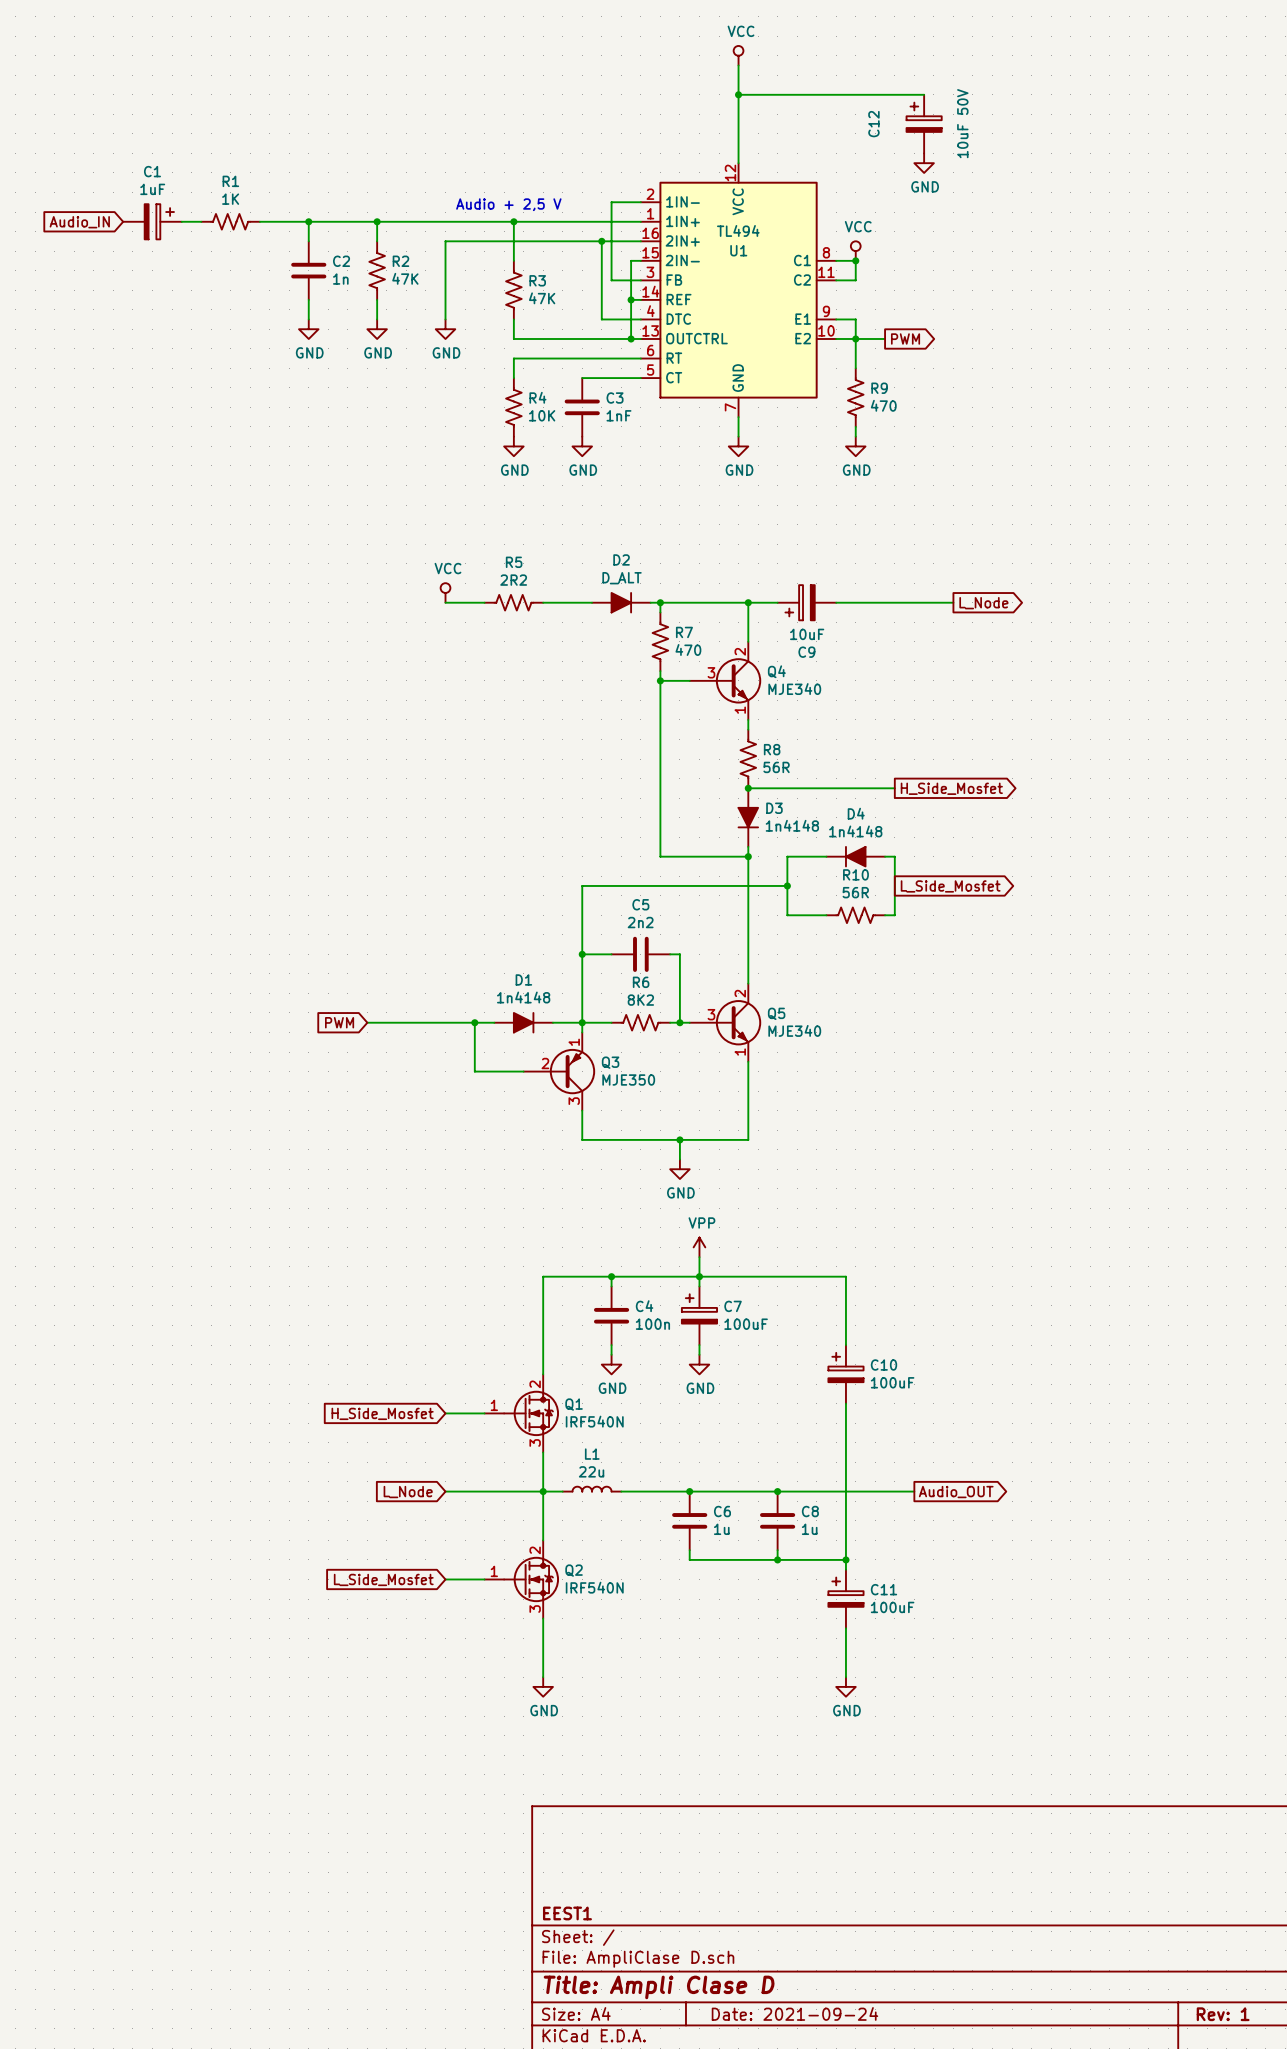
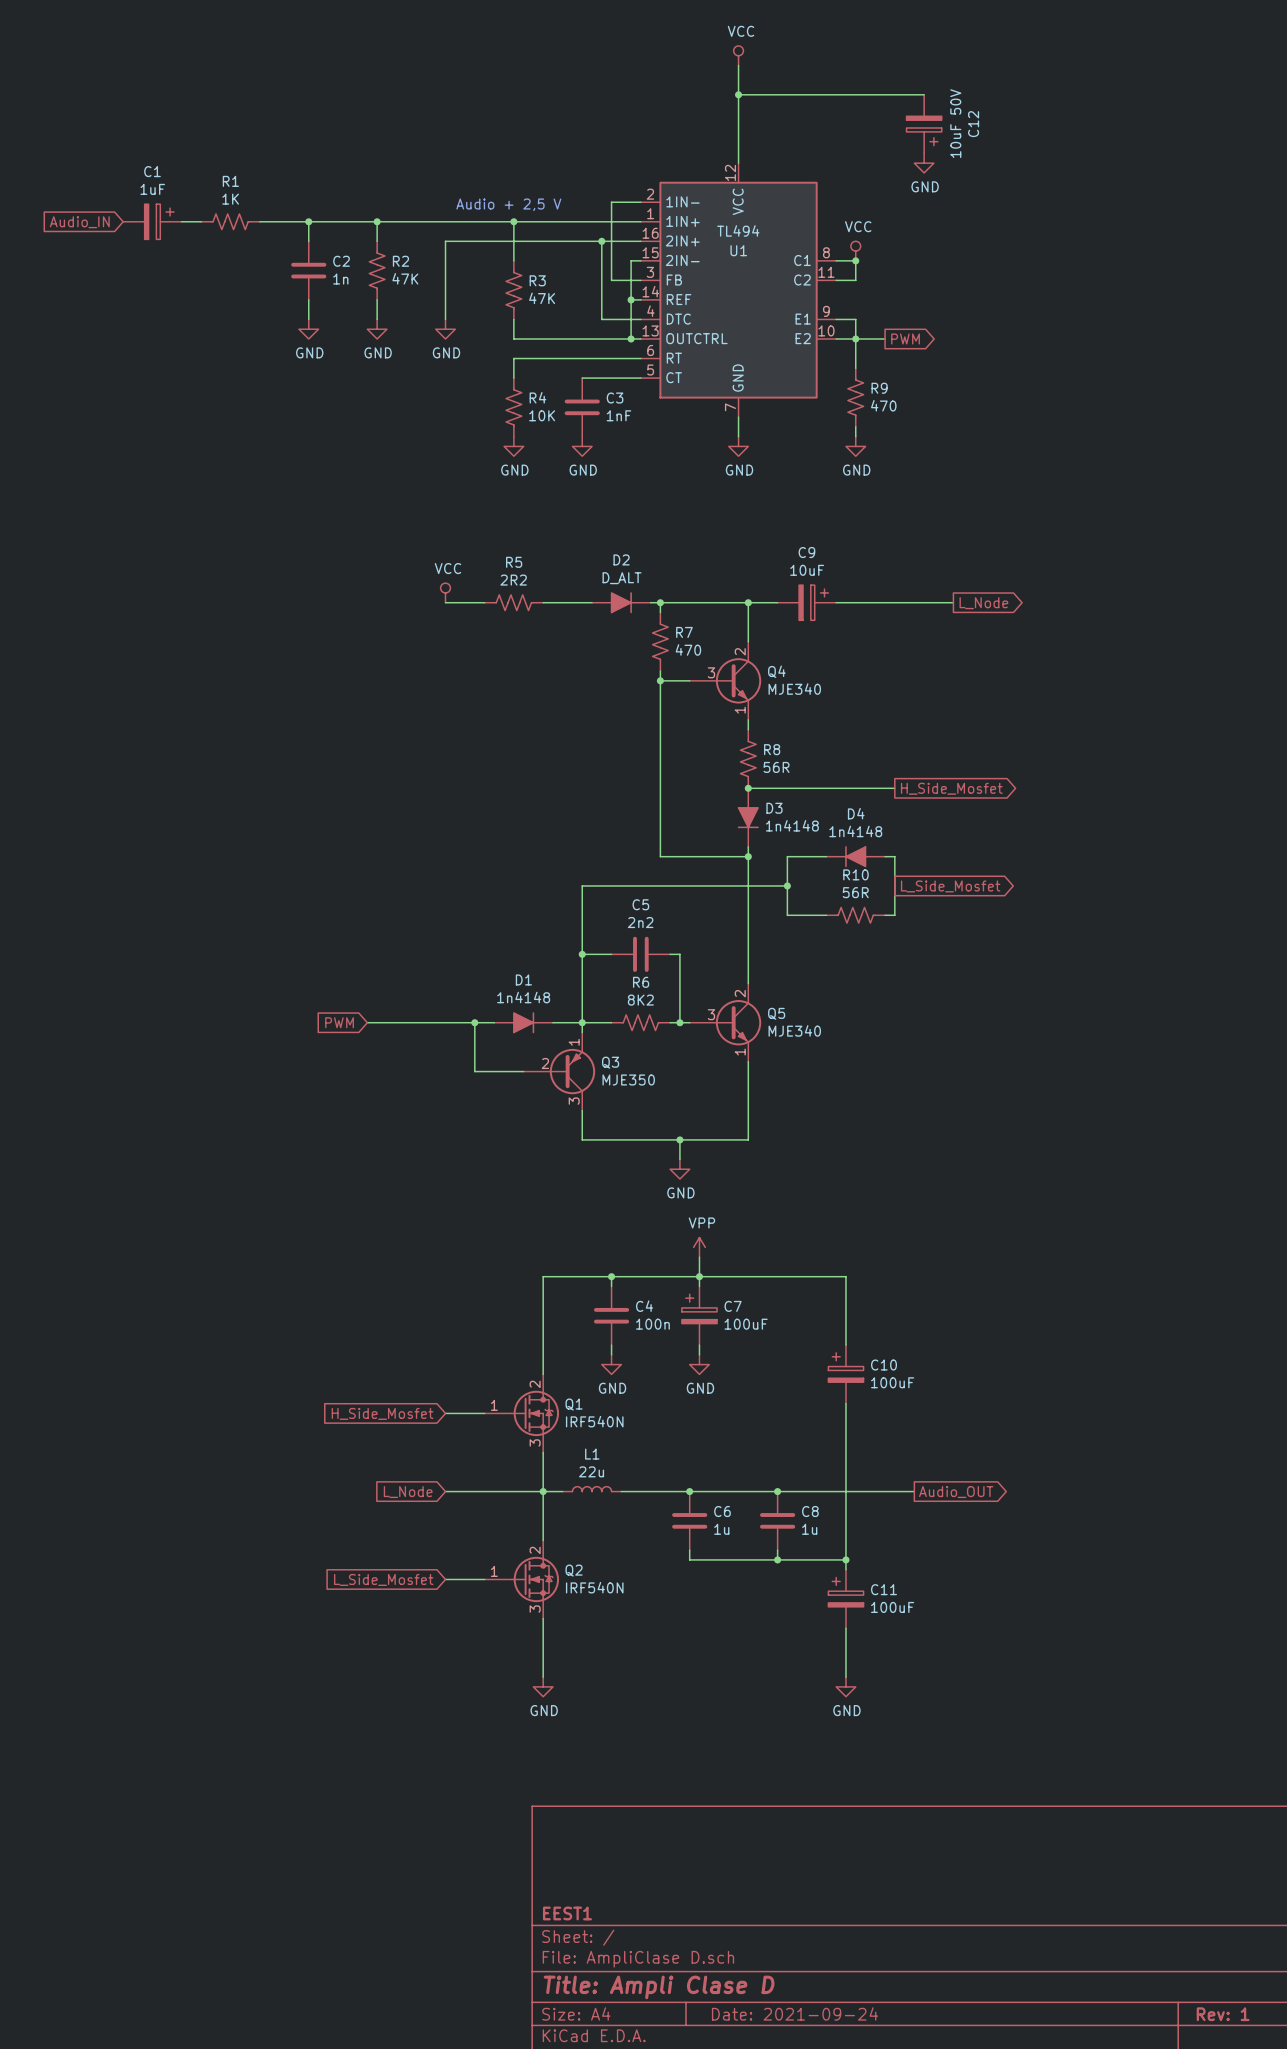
C12 rotation: 0° (924, 117) -> 180° (924, 130)
C9 rotation: 0° (800, 602) -> 180° (813, 602)

